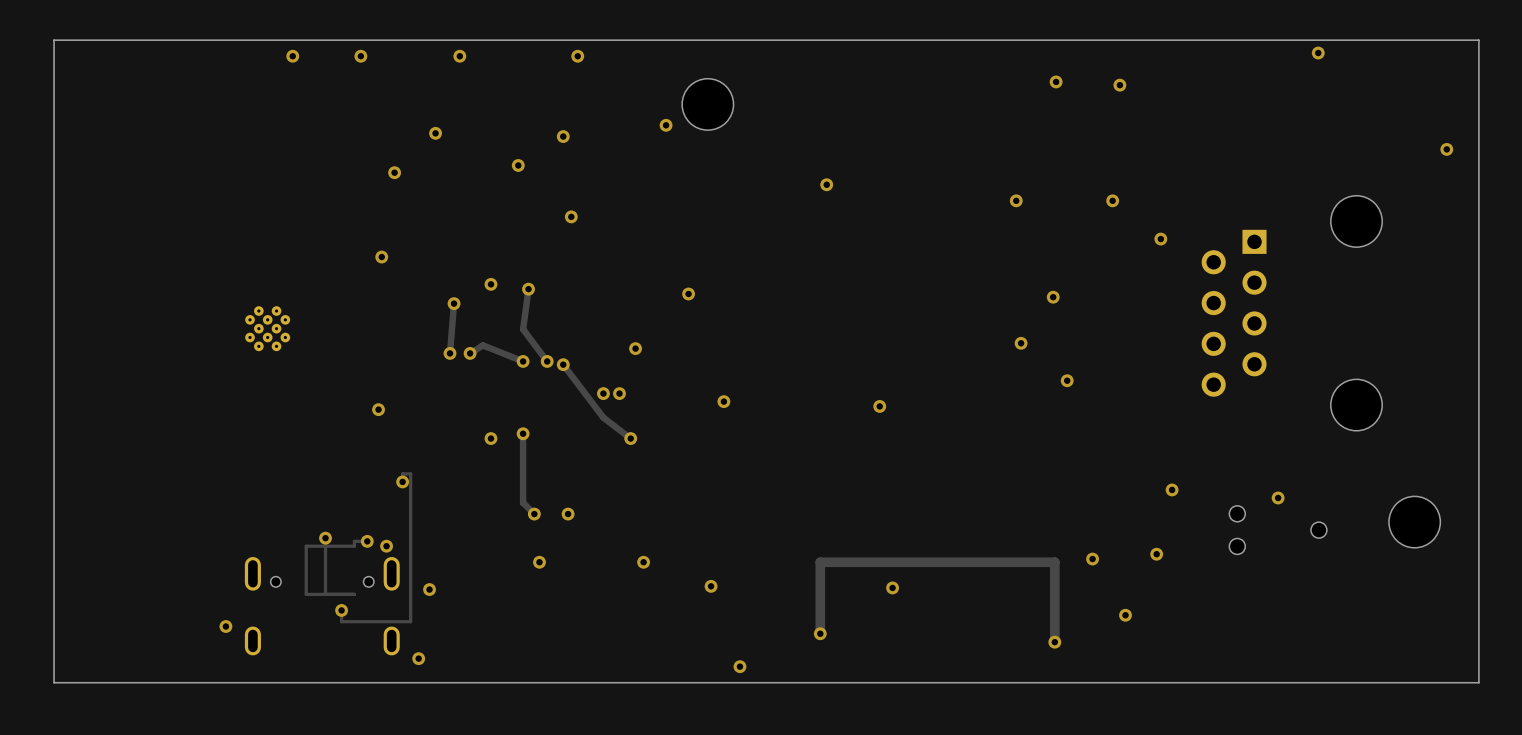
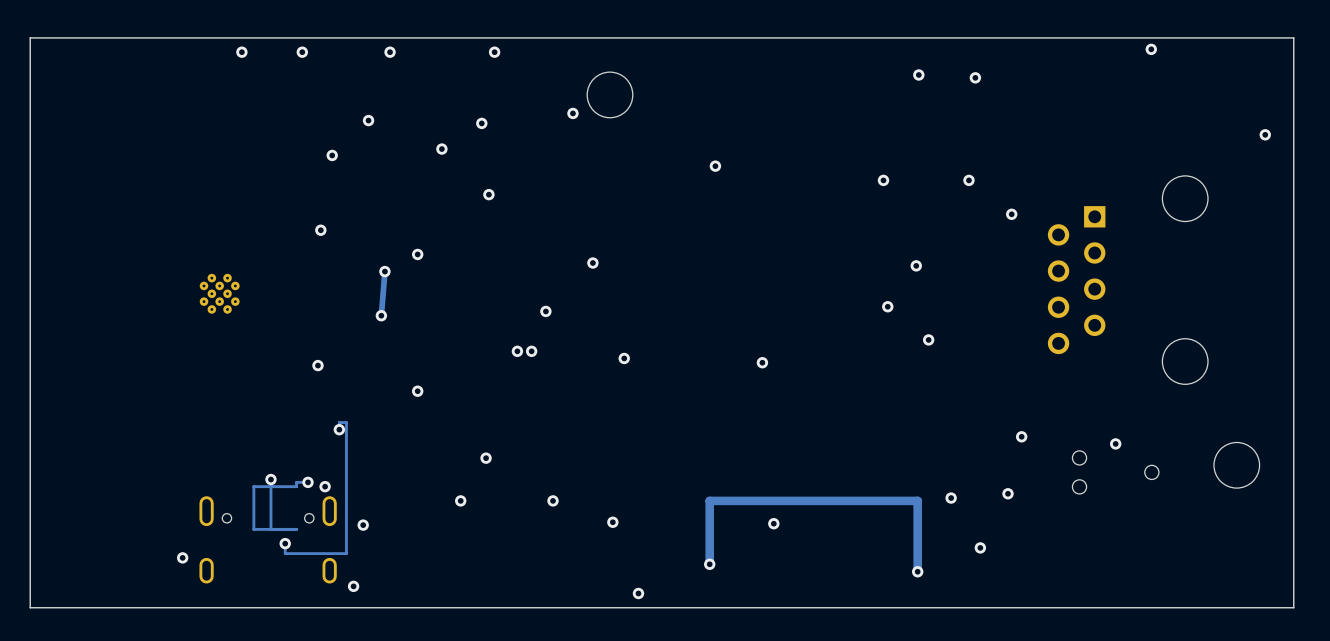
track: (528, 289) (523, 329) (547, 361) -> none
via: (528, 289) -> none
track: (470, 353) (482, 345) (523, 361) -> none
via: (470, 353) -> none
via: (523, 361) -> none
via: (547, 361) -> none
track: (563, 364) (603, 417) (630, 438) -> none
via: (563, 364) -> none
track: (523, 433) (523, 502) (534, 514) -> none
via: (523, 433) -> none
via: (630, 438) -> none
via: (534, 514) -> none

